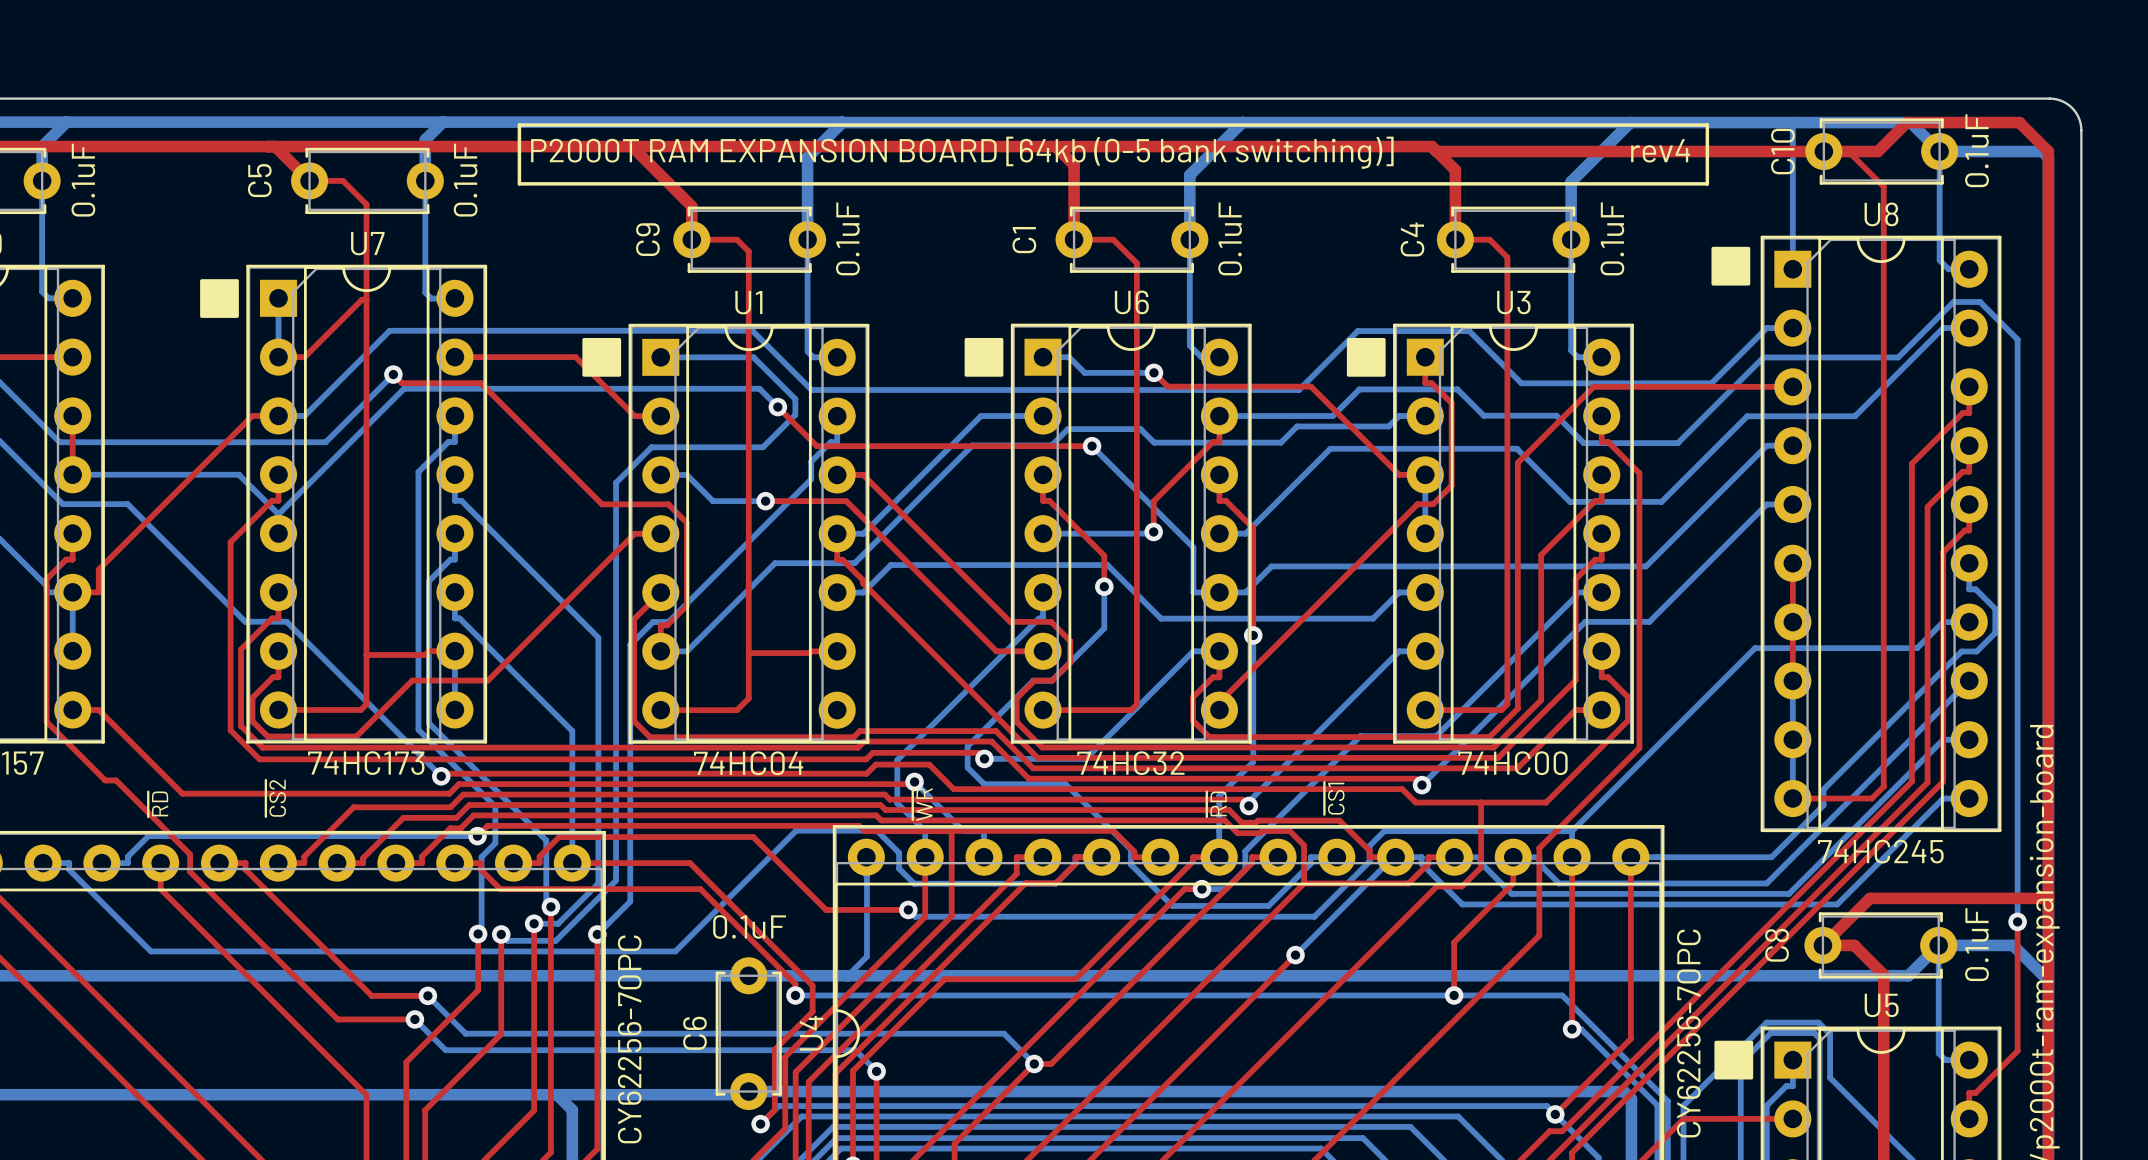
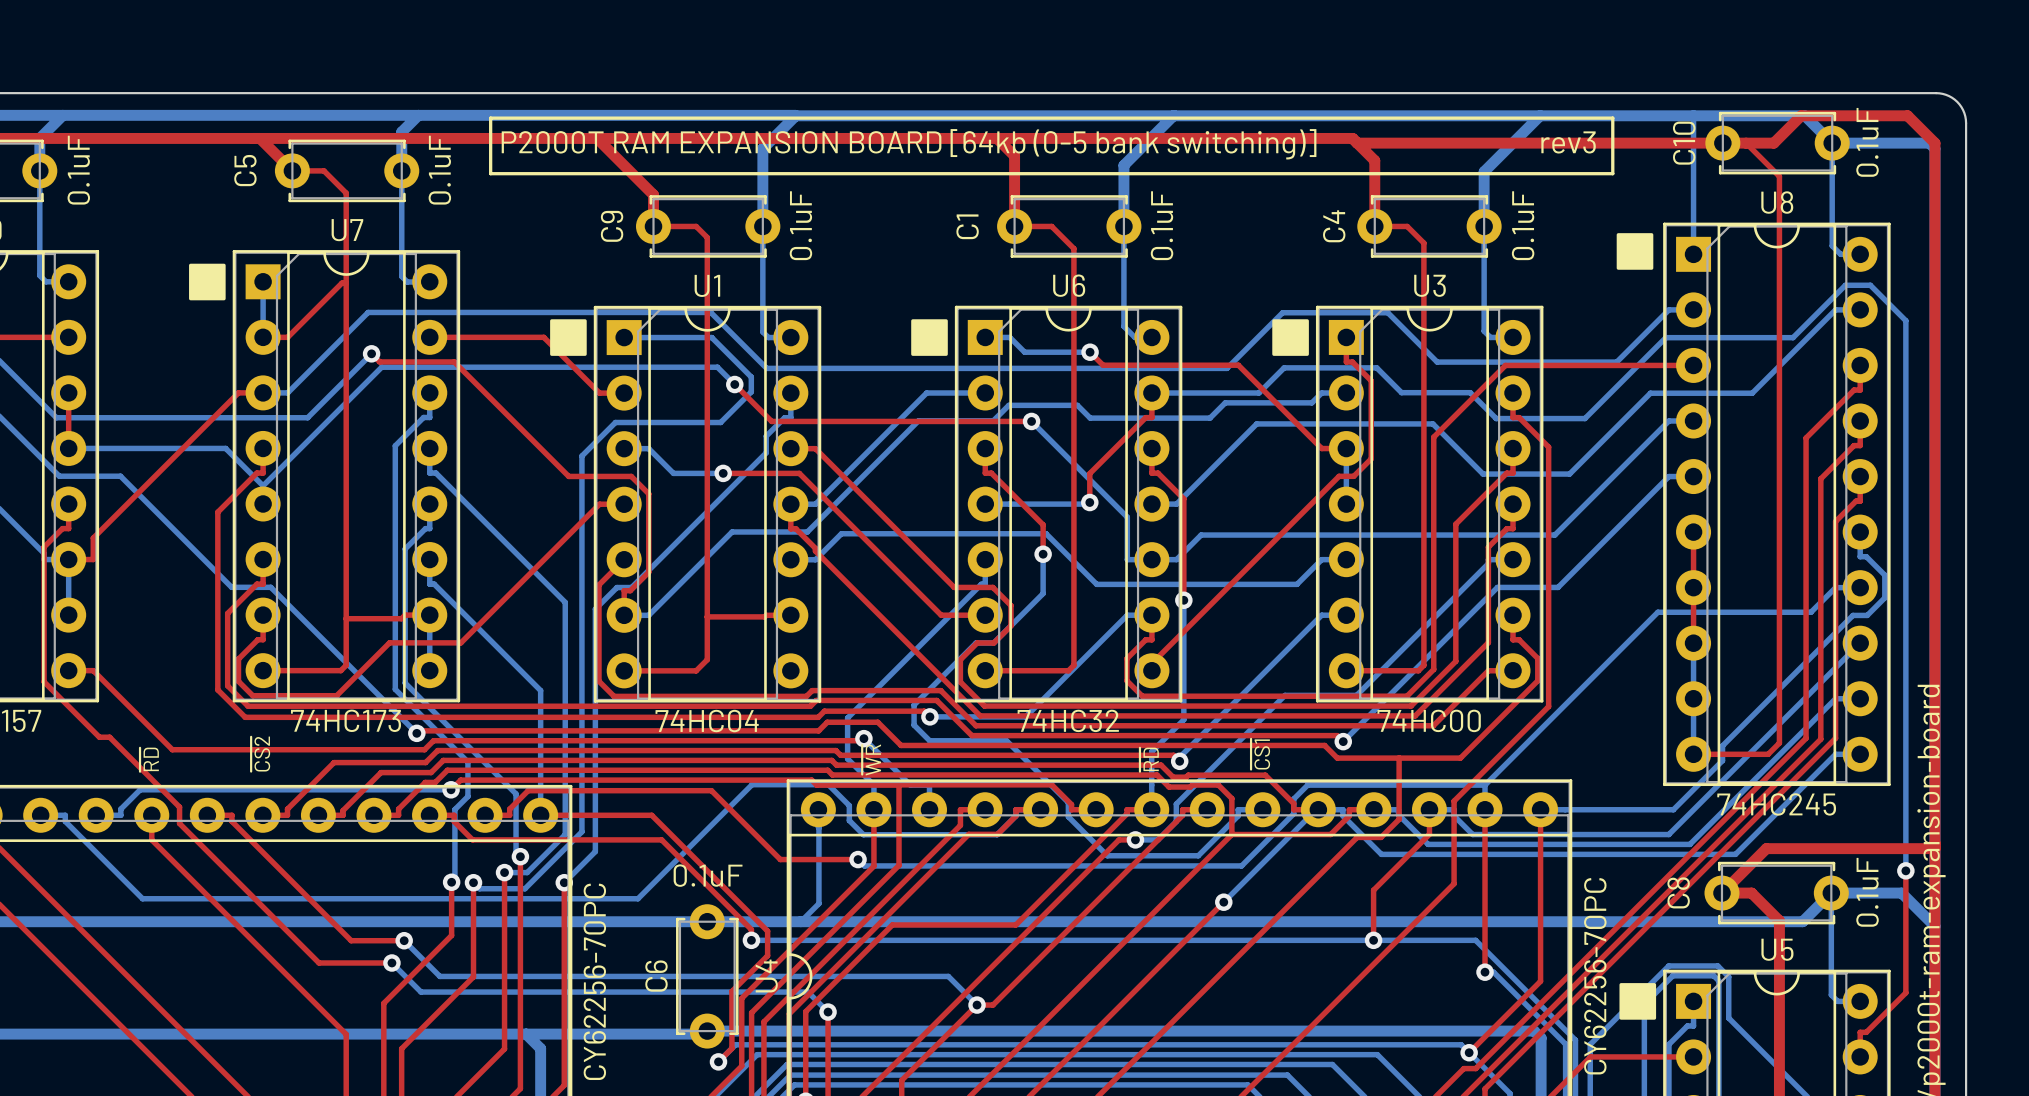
text: rev4 (1660, 150) -> rev3 (1568, 142)

